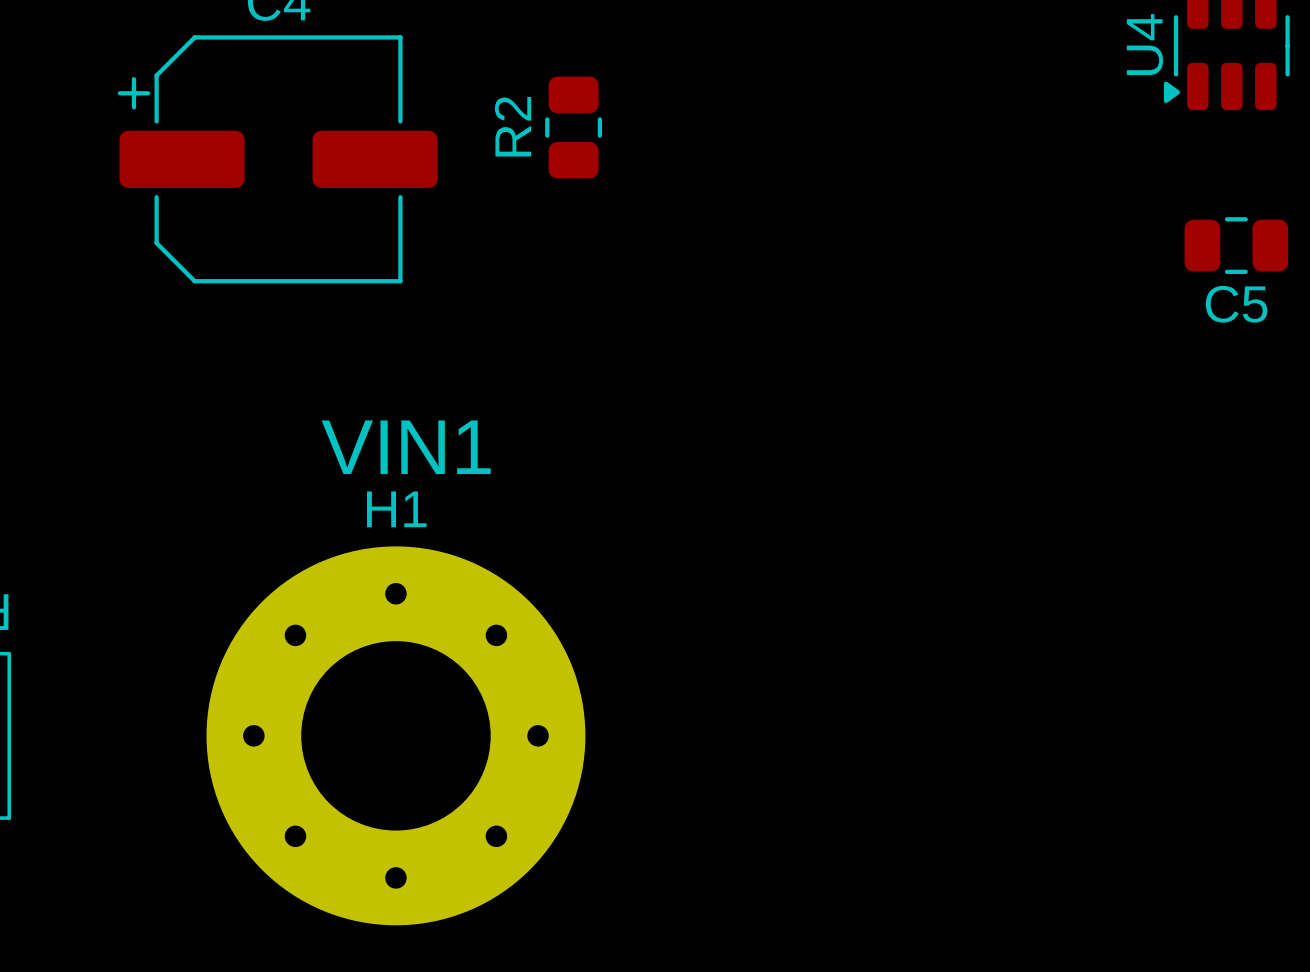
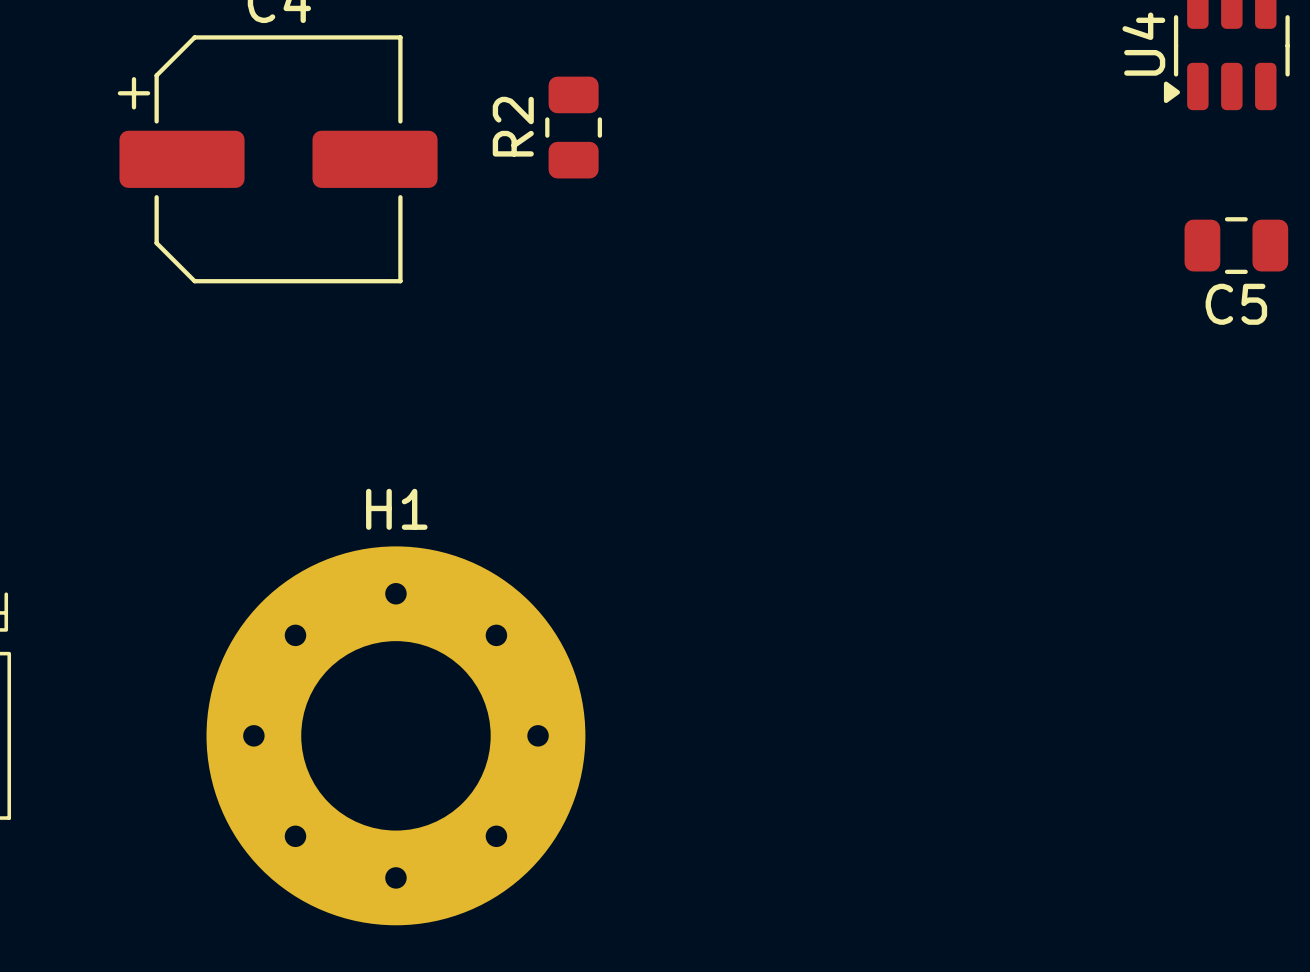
text: VIN1 (406, 447) -> none

